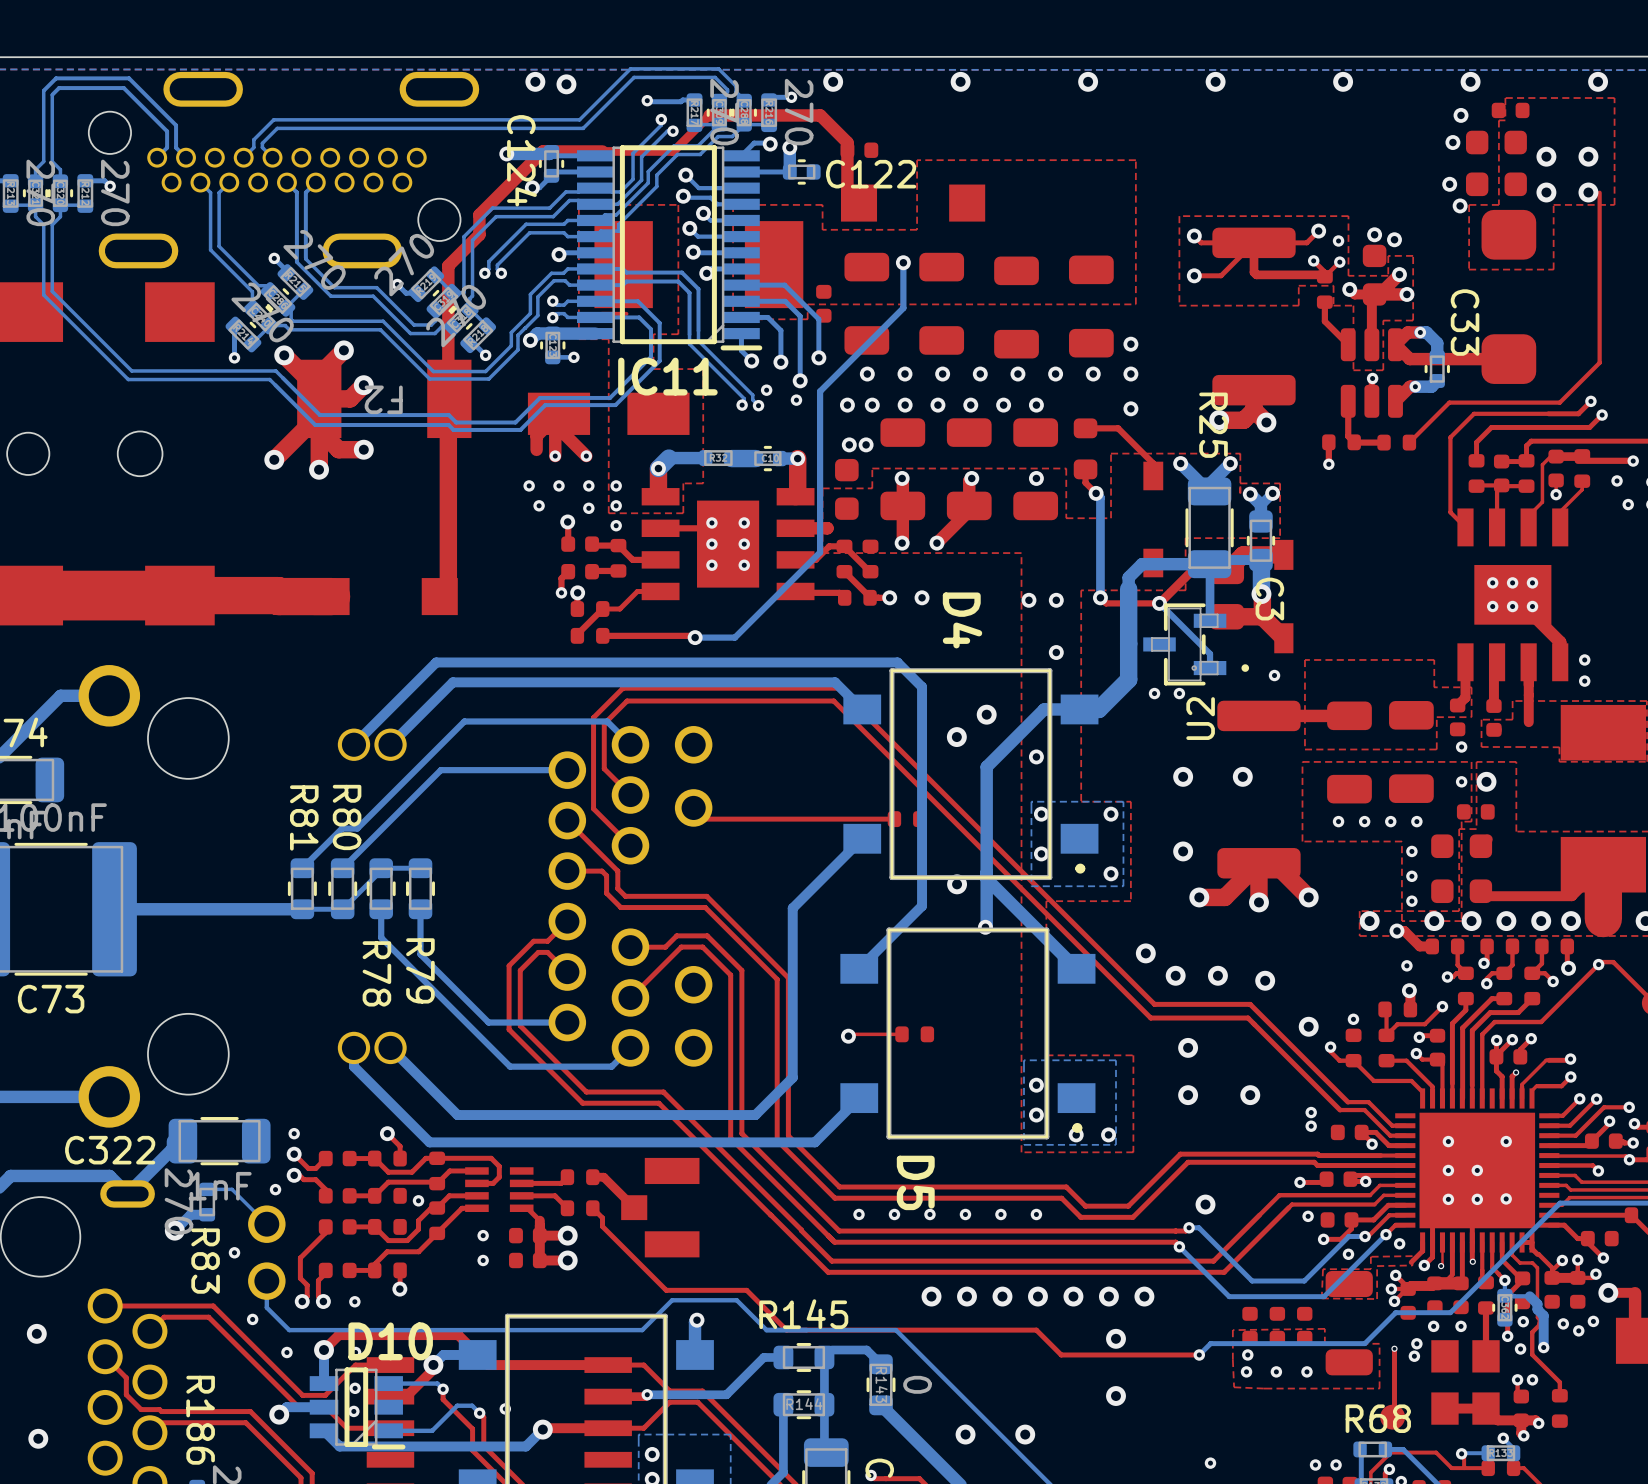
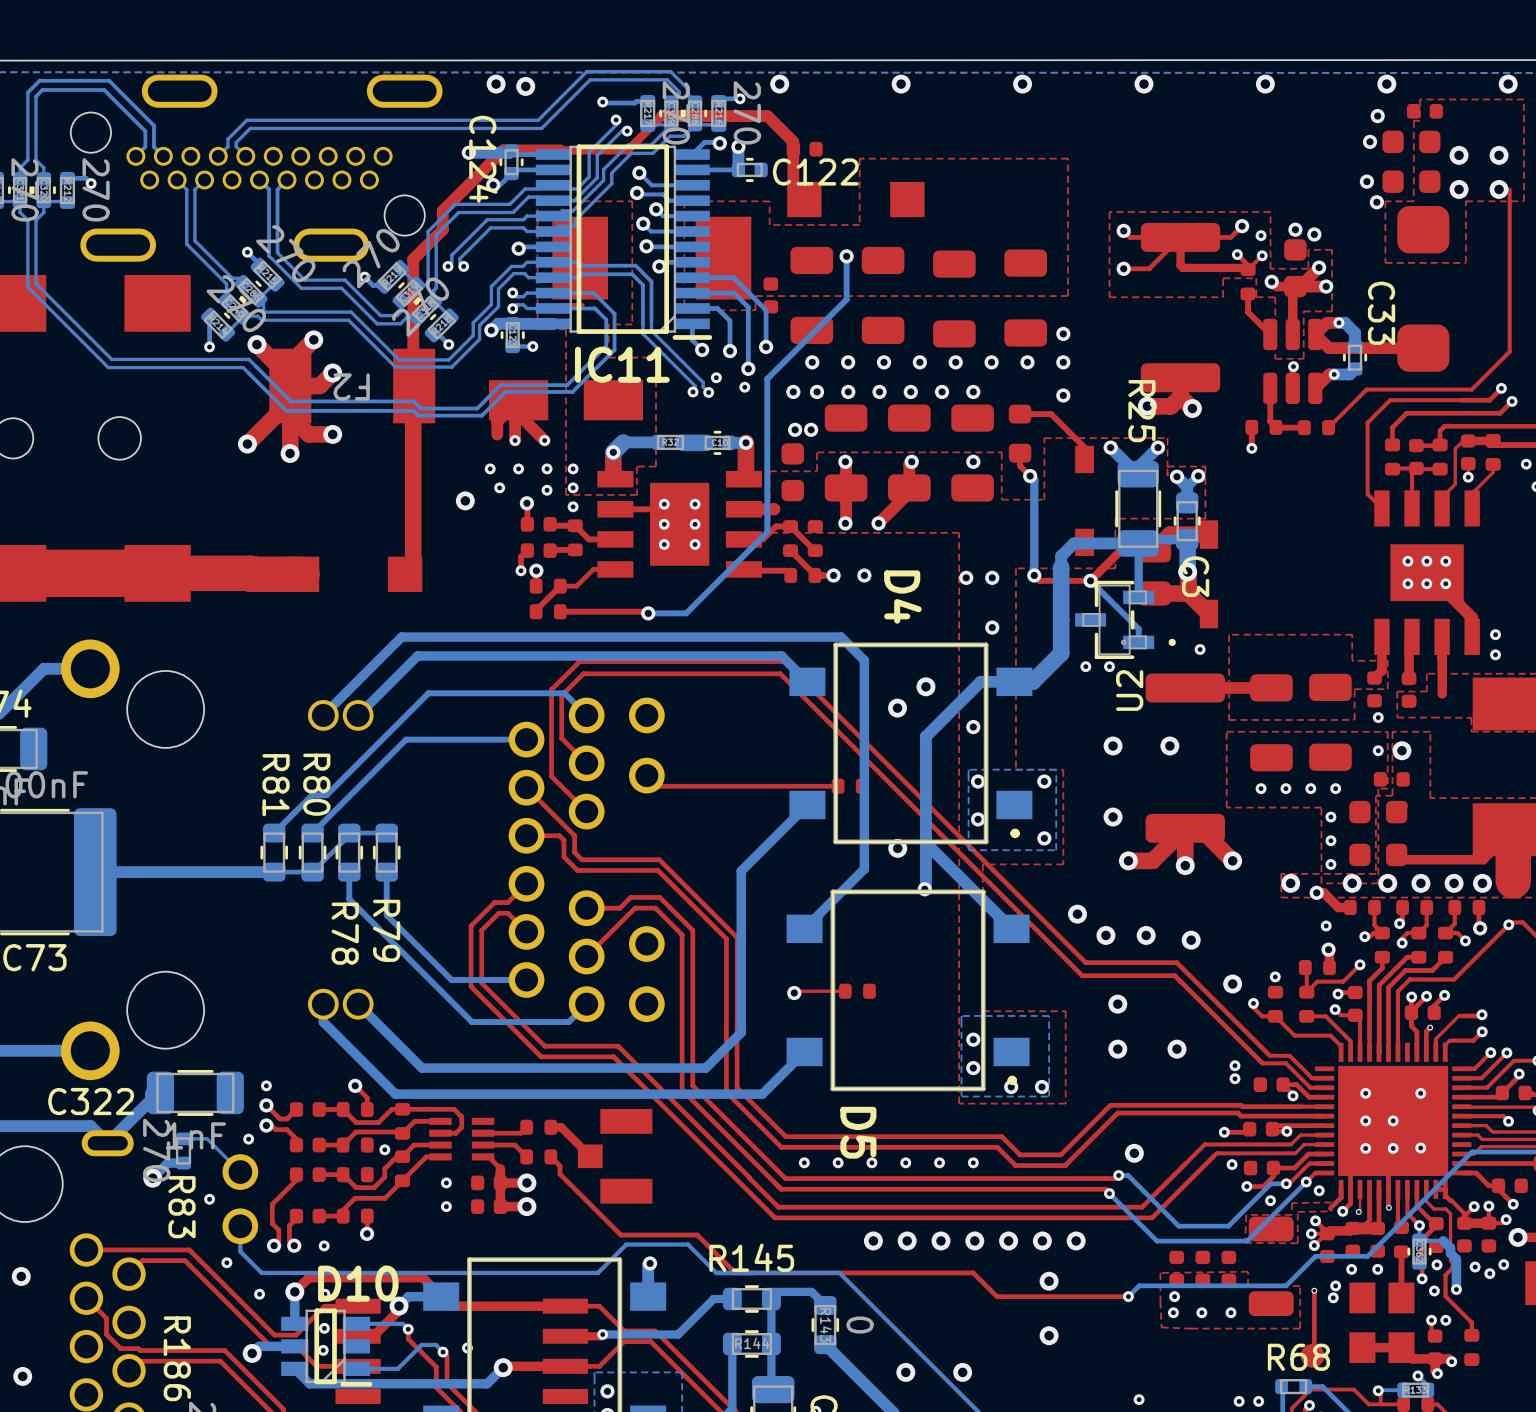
via: none -> (465, 500)

